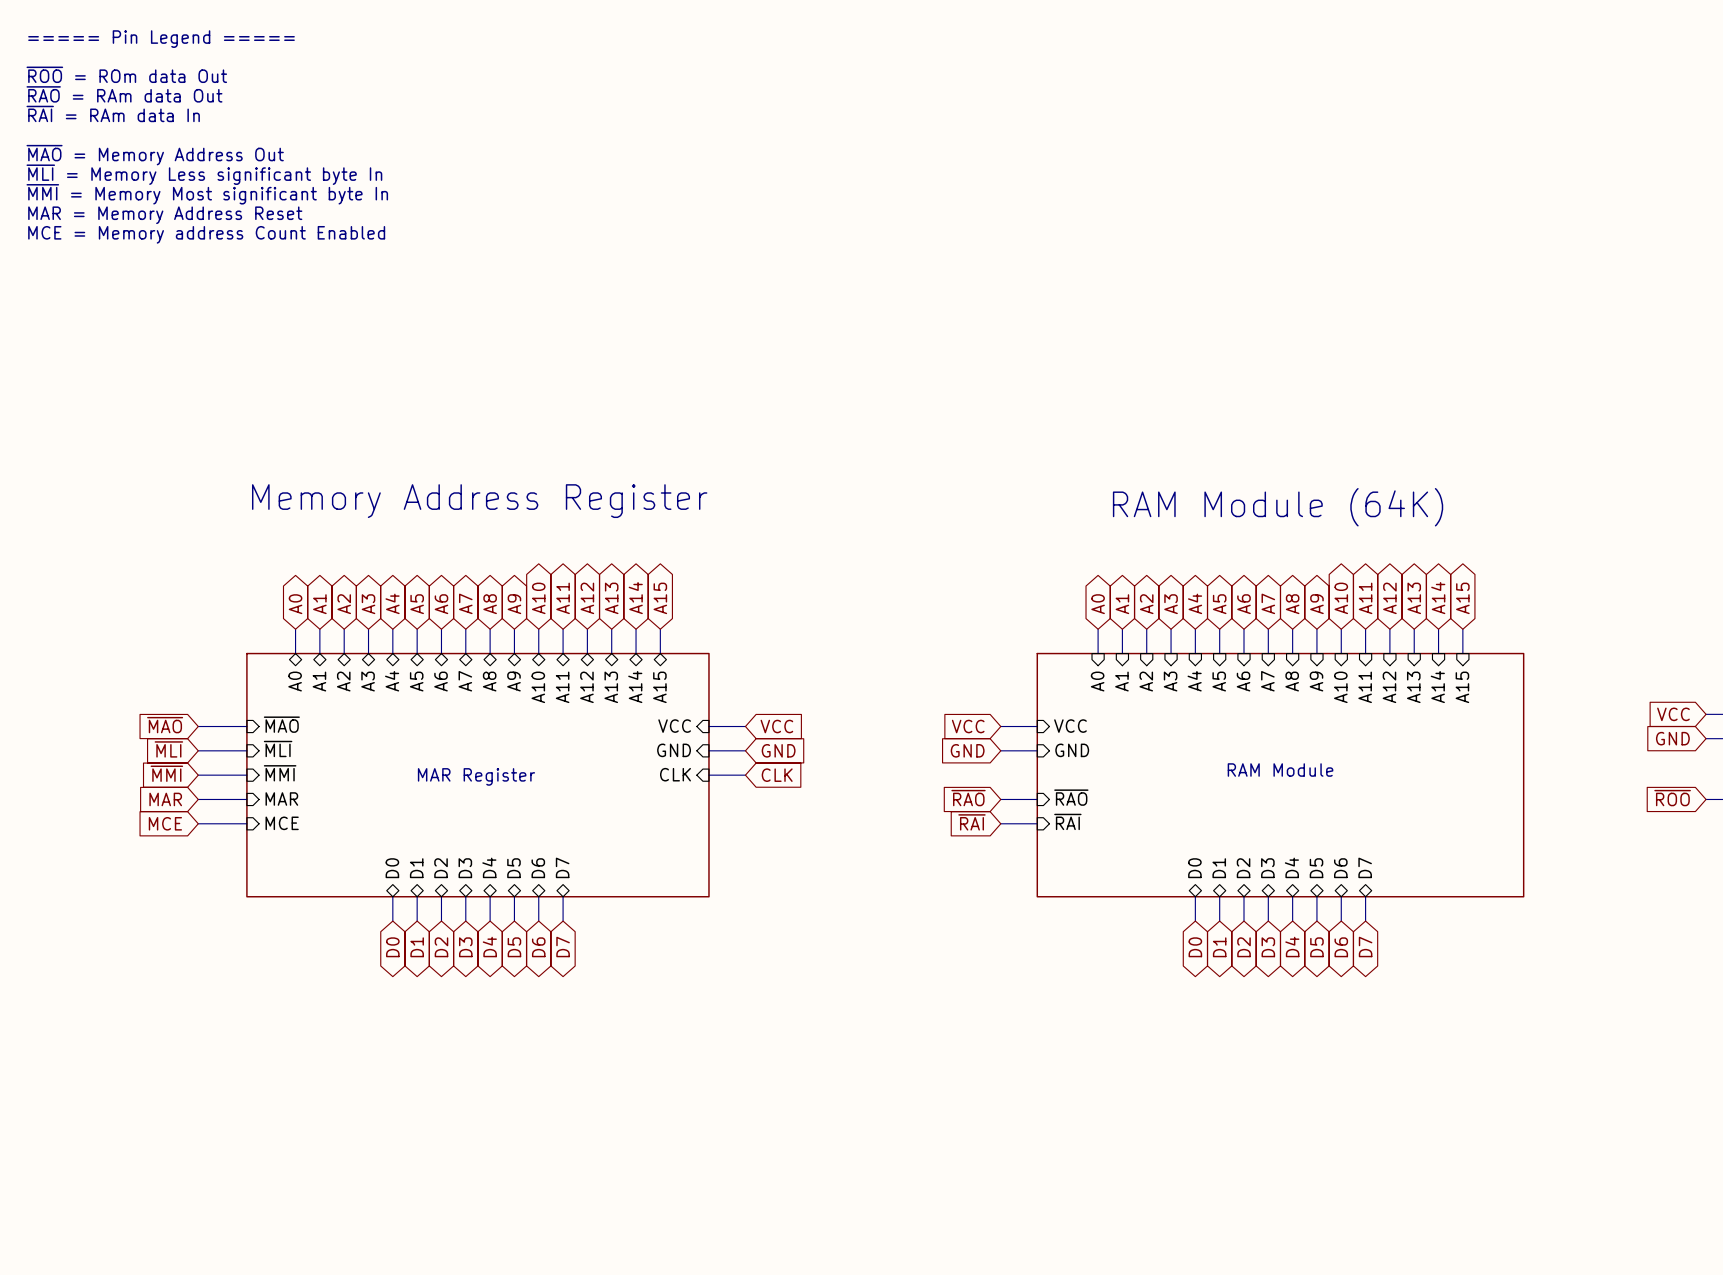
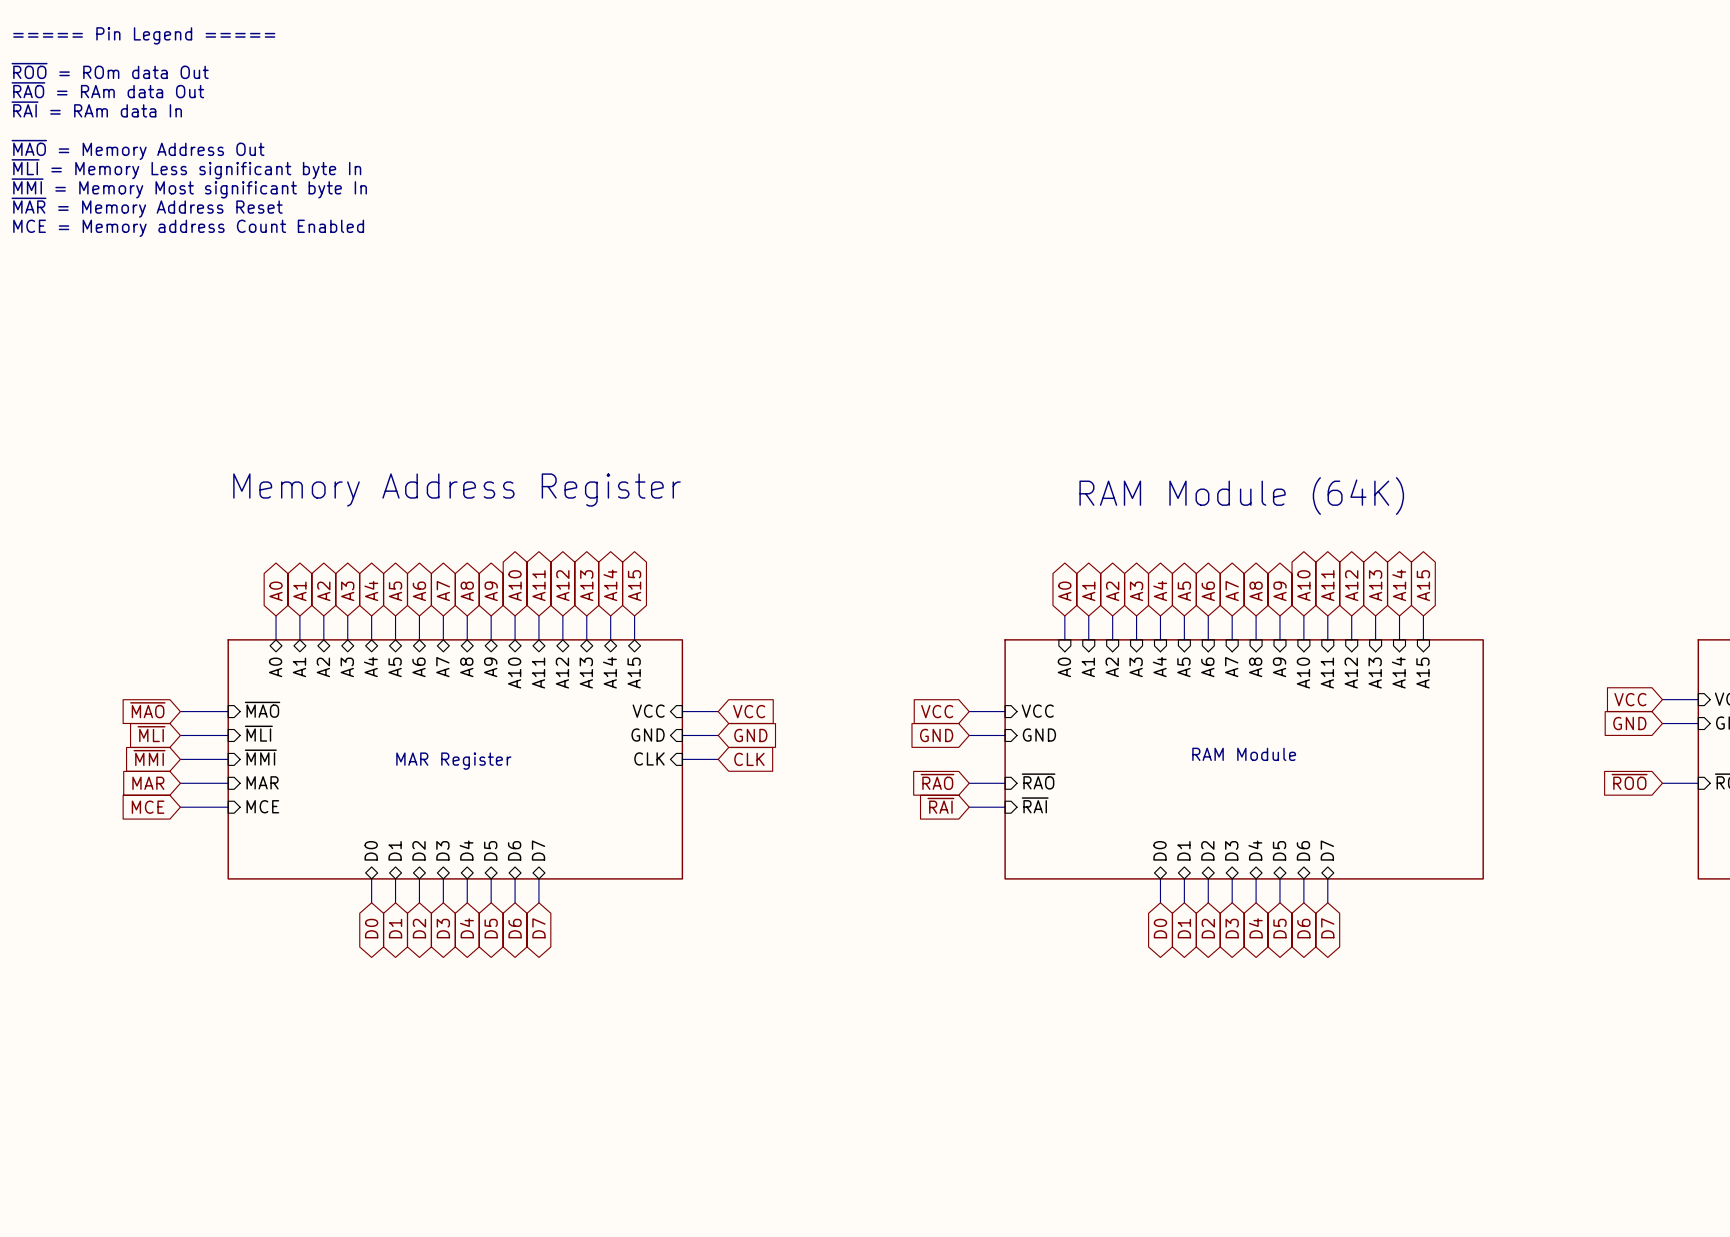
text: MAR = Memory Address Reset (165, 215) -> ~{MAR} = Memory Address Reset (147, 207)

